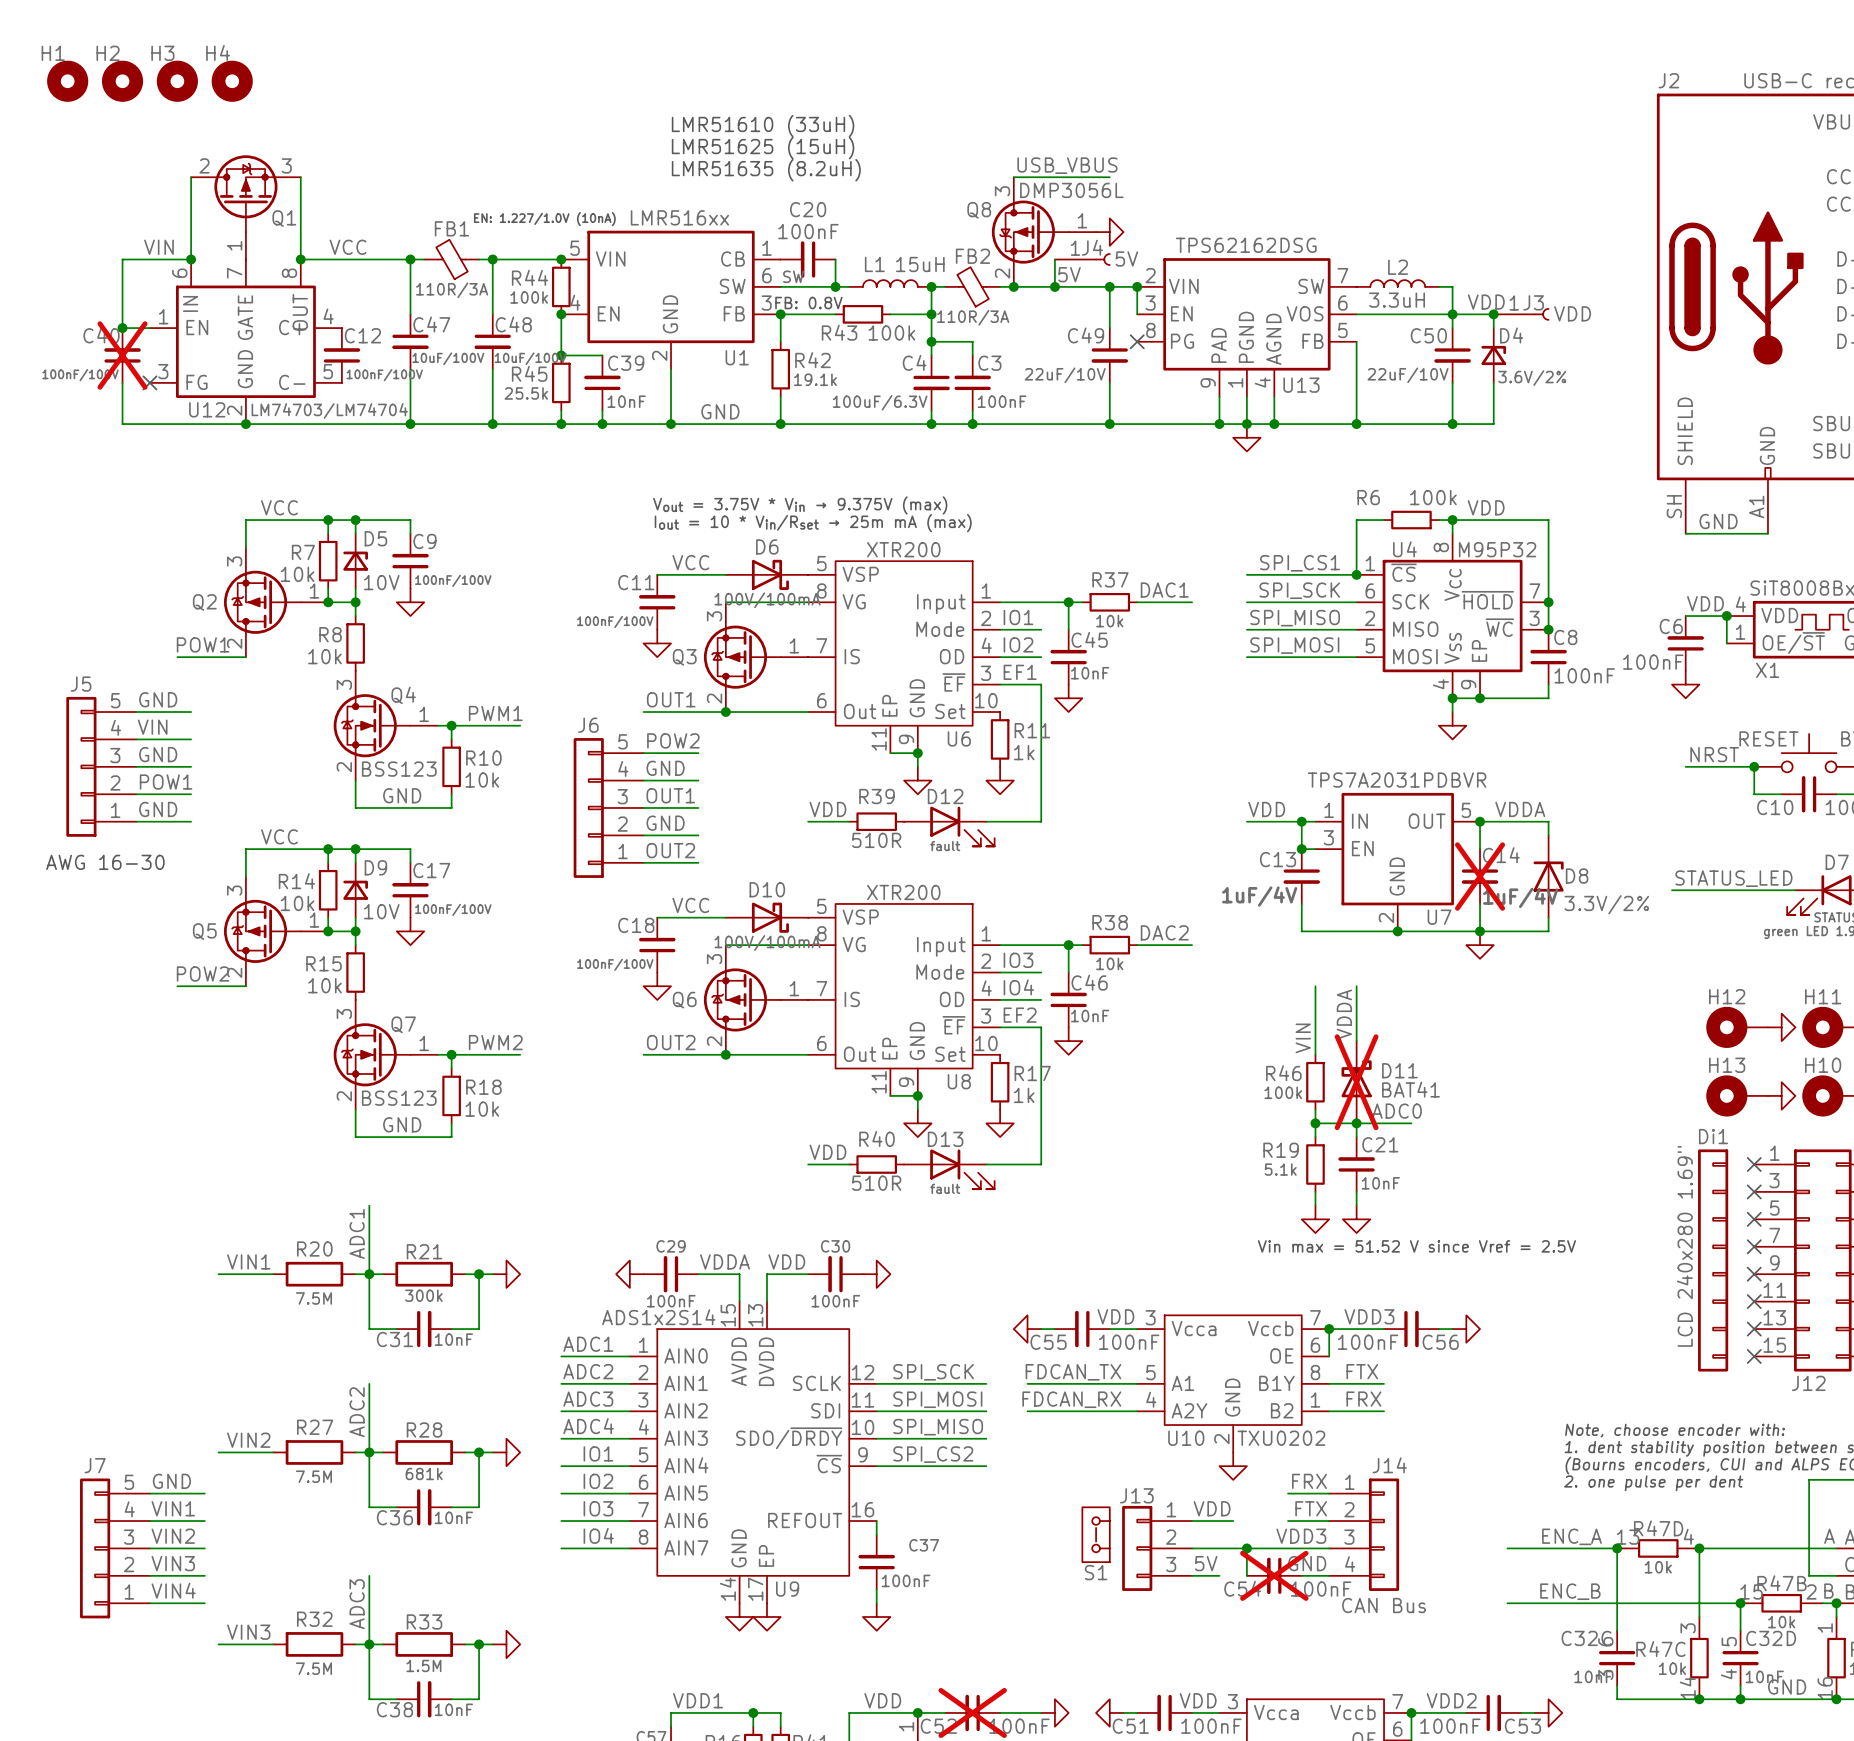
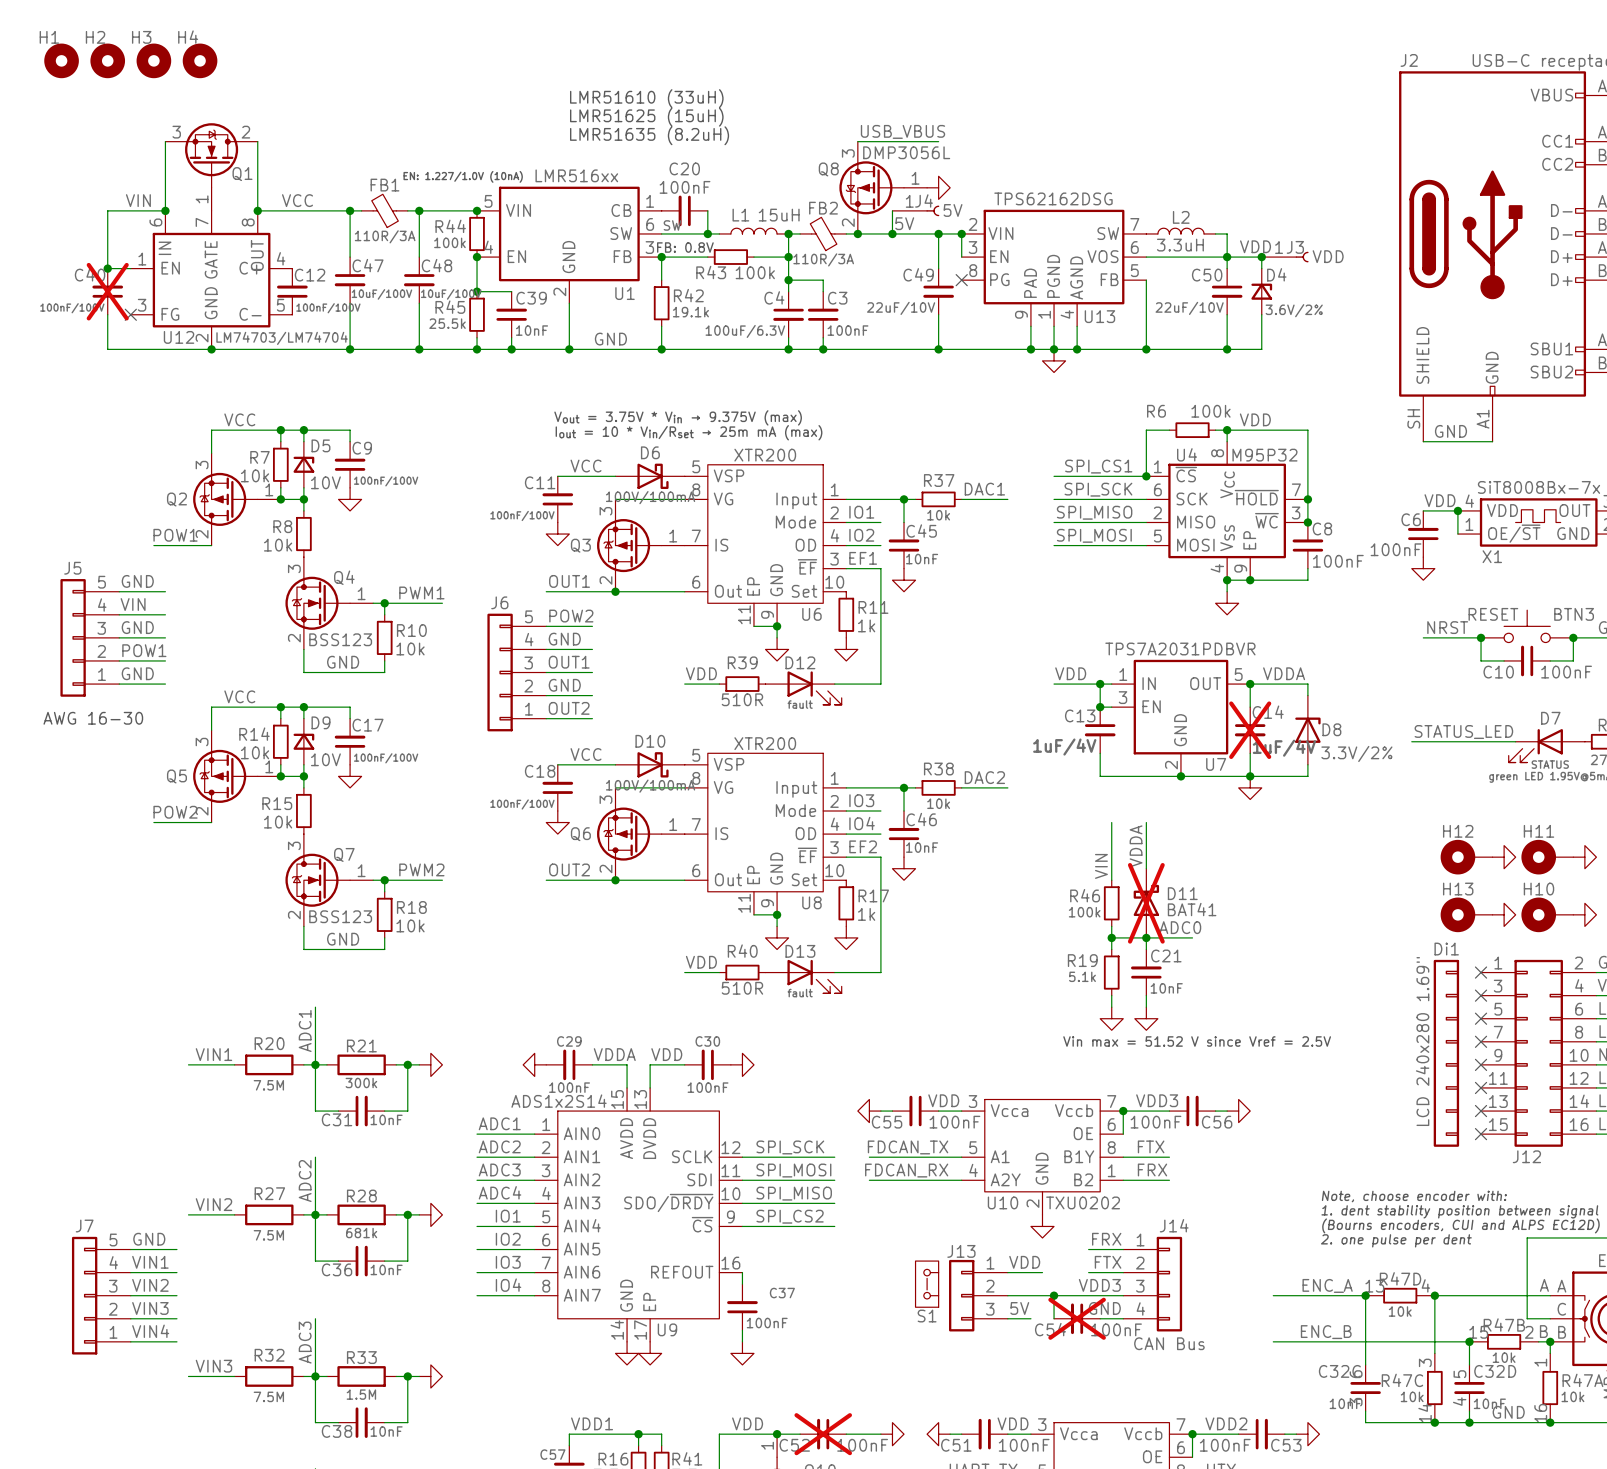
Q1 symbol: [191, 155, 301, 260] -> [165, 123, 258, 211]

